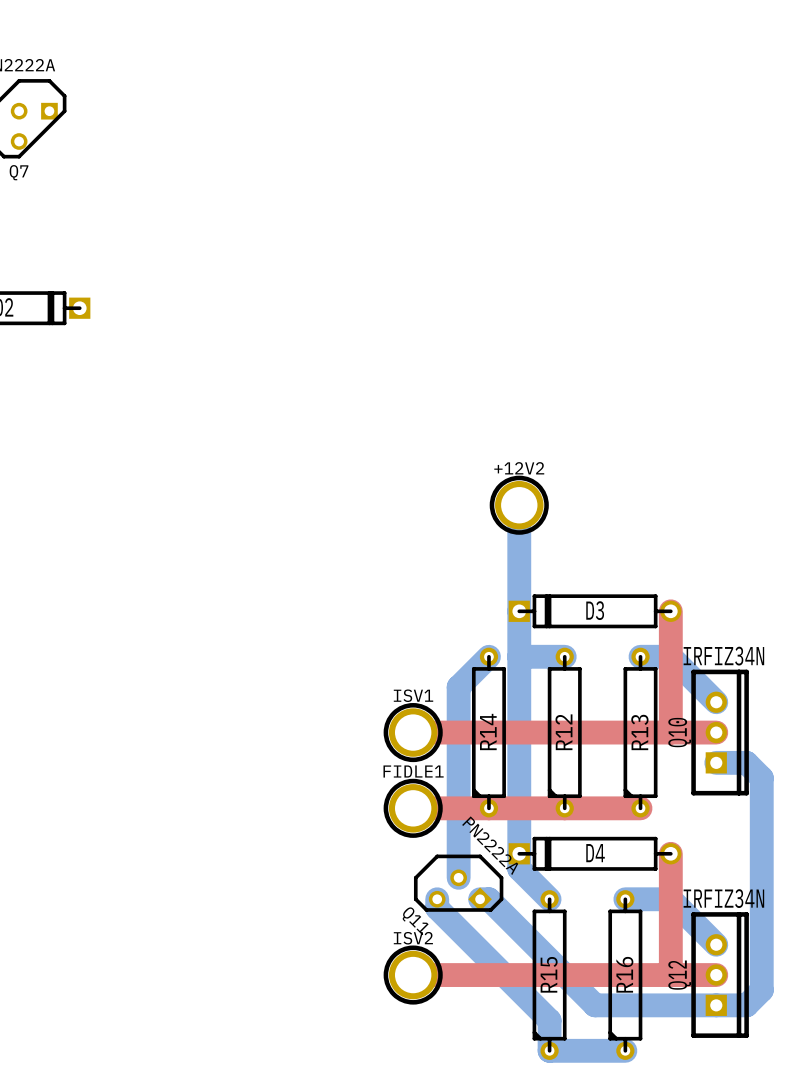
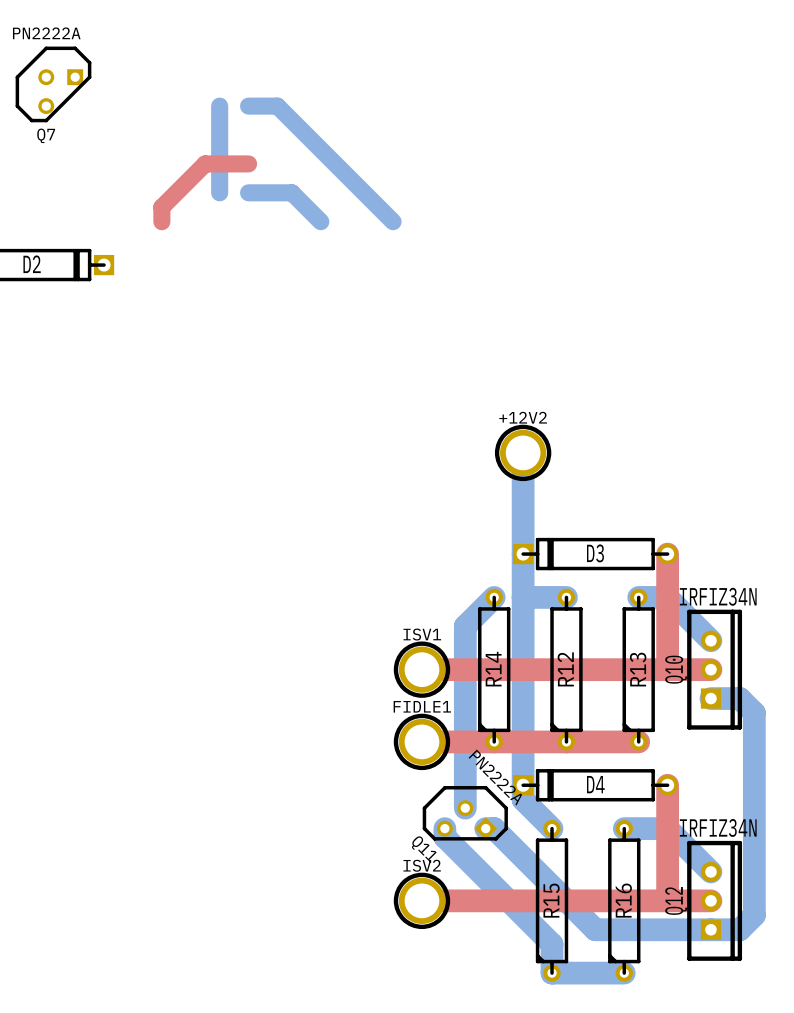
bottom track: none -> (219, 106) (219, 192)
bottom track: none -> (248, 106) (277, 106) (393, 221)
top track: none -> (248, 163) (205, 163) (161, 207) (161, 221)
bottom track: none -> (248, 192) (291, 192) (320, 221)

